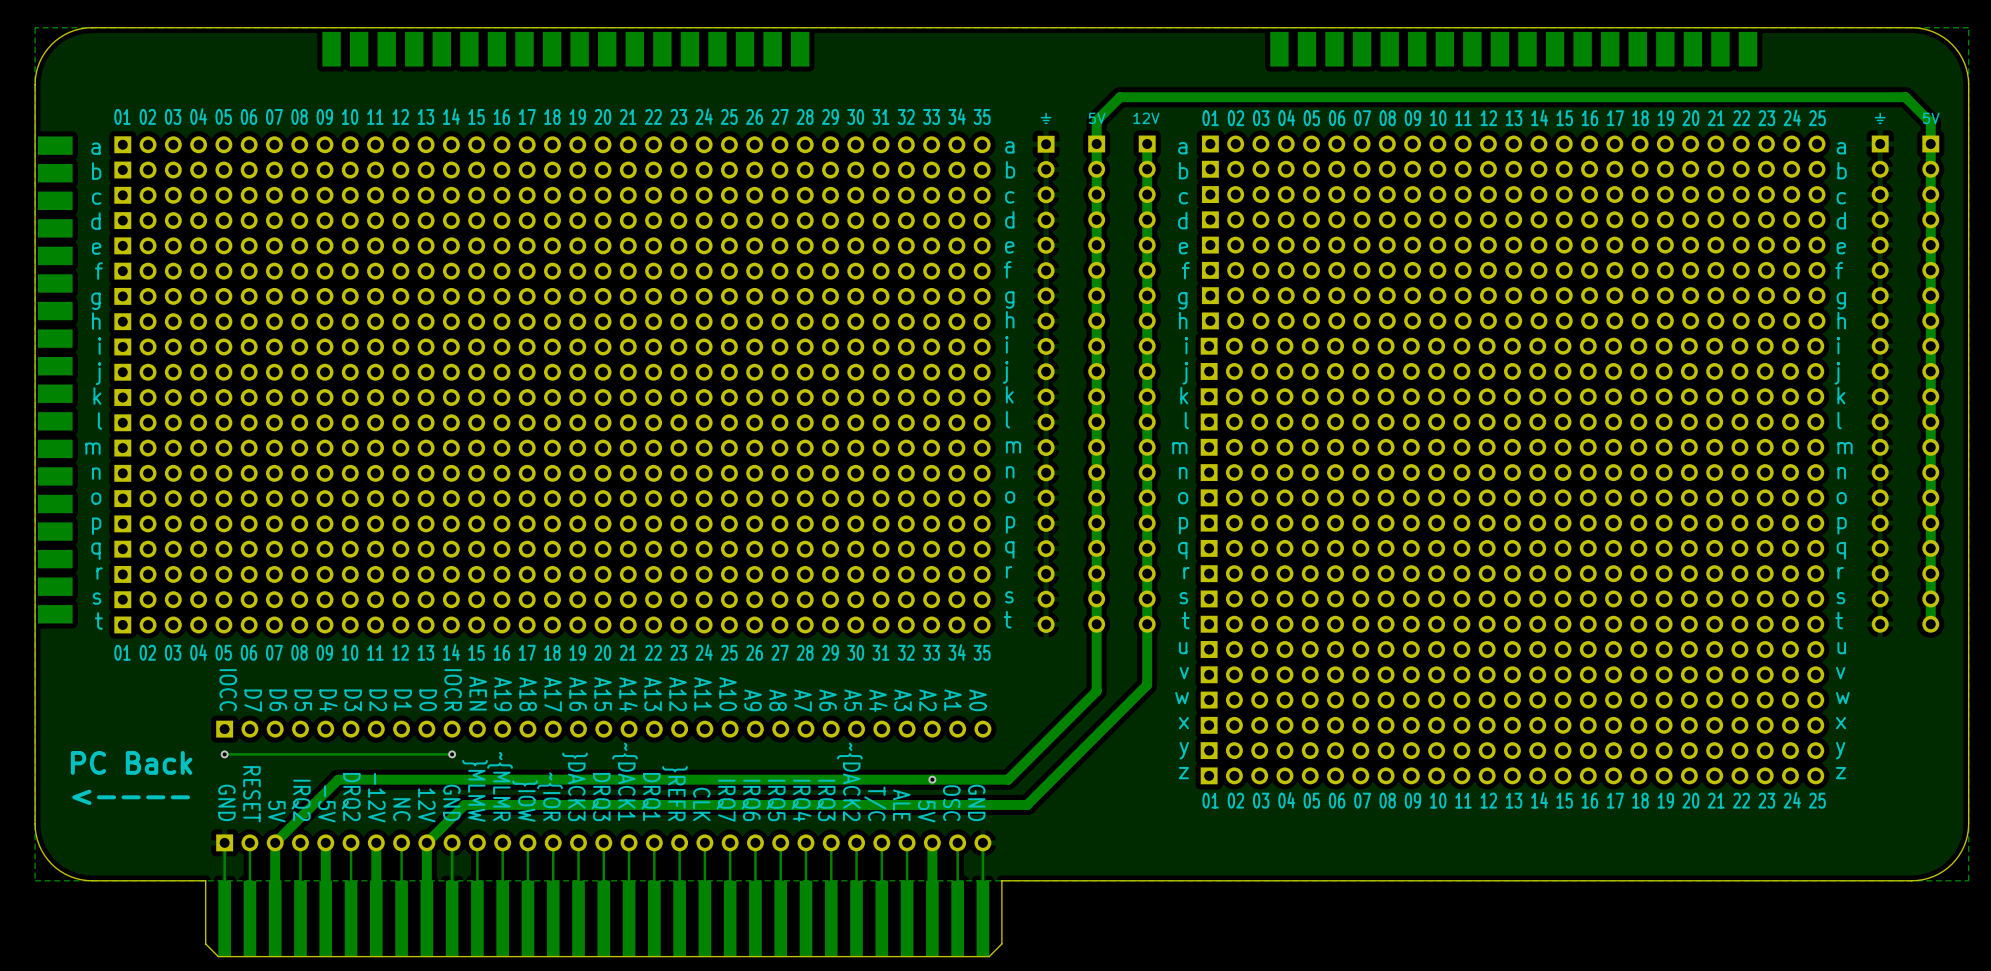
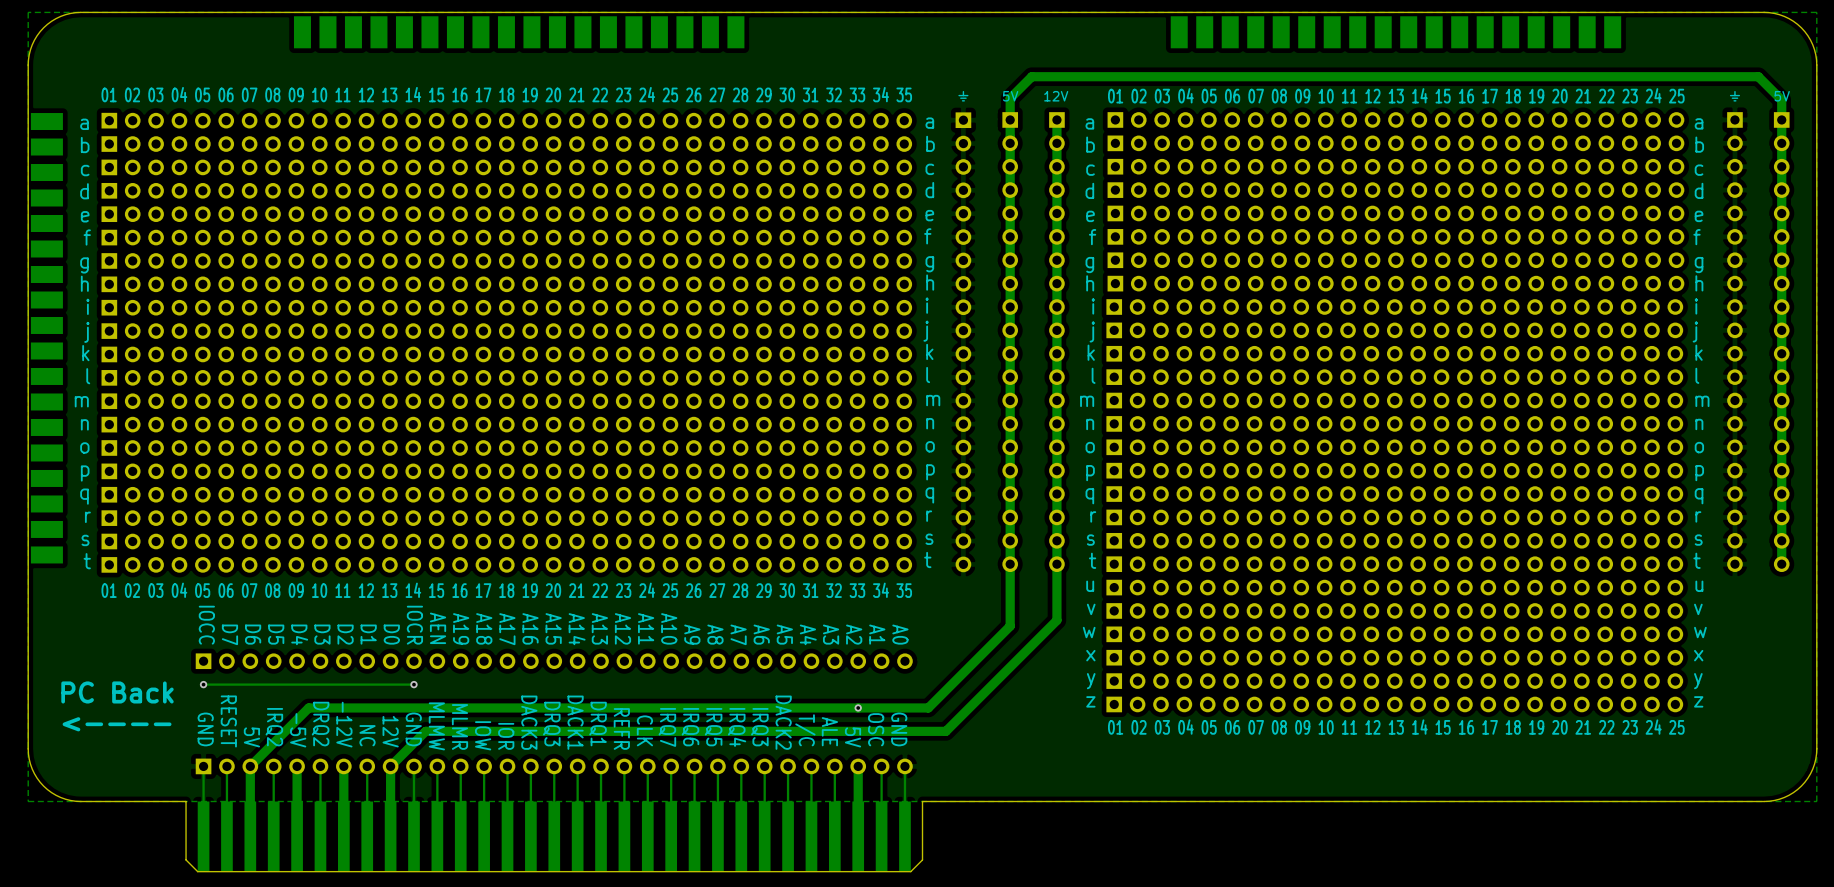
text: ~{DACK1 (624, 781) -> DACK1 (575, 722)
text: ~{DACK2 (849, 781) -> DACK2 (783, 722)
text: ~{MLMR (500, 786) -> MLMR (459, 726)
text: }DACK3 (575, 786) -> DACK3 (529, 722)
text: }MLMW (475, 790) -> MLMW (436, 726)
text: }REFR (674, 793) -> REFR (621, 728)
text: ~{IOR (550, 796) -> IOR (506, 736)
text: }IOW (525, 801) -> IOW (483, 735)

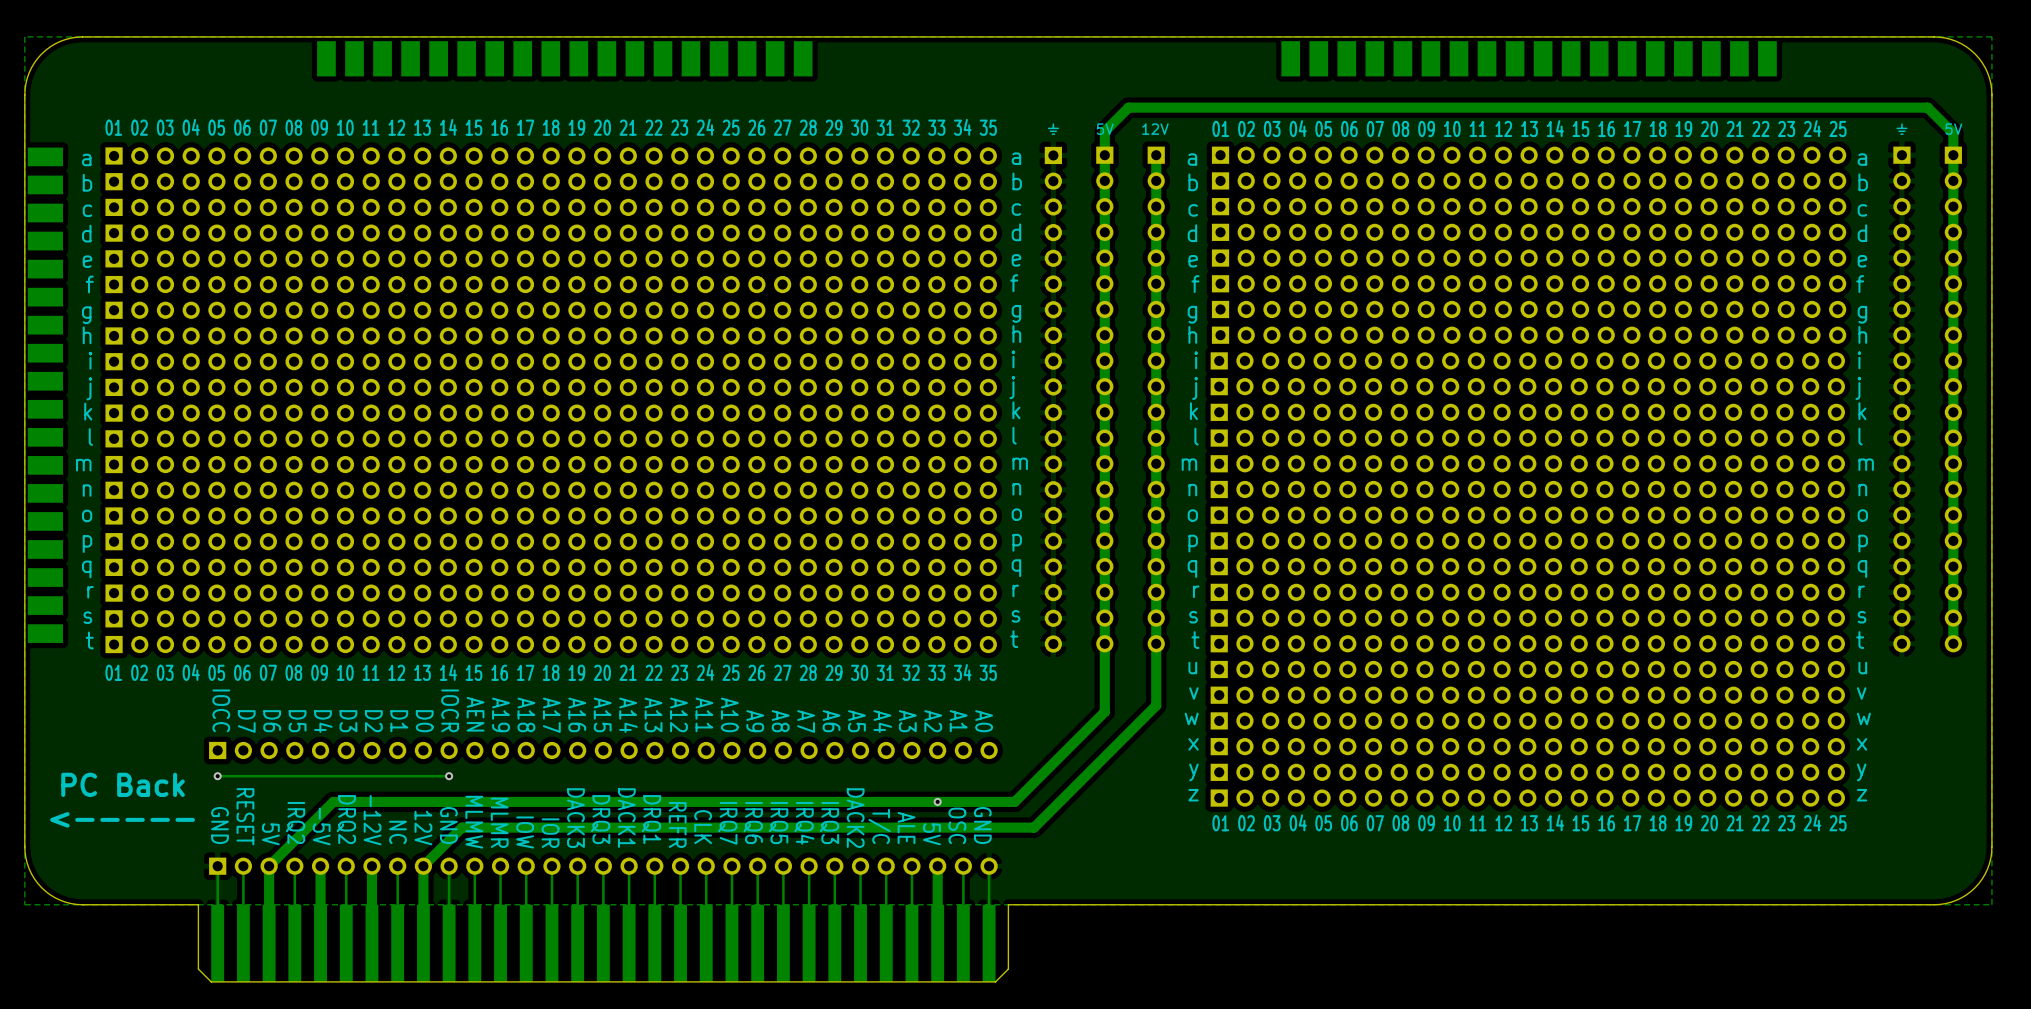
text: <---- (117, 724) -> <----- (122, 819)

